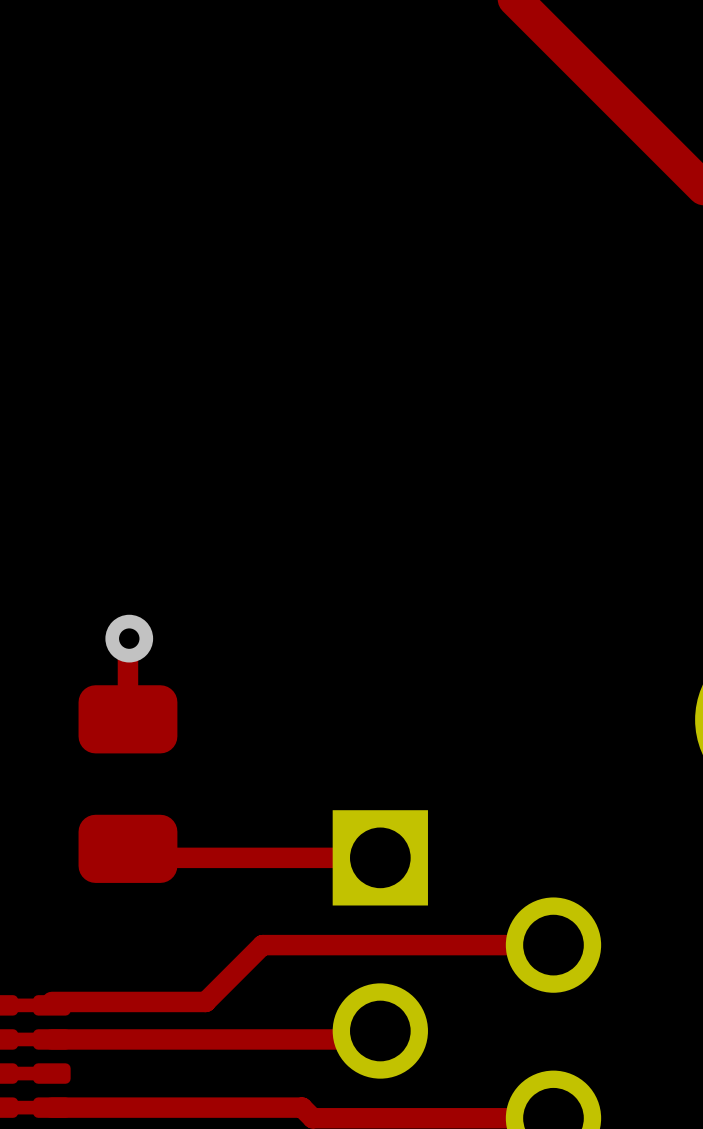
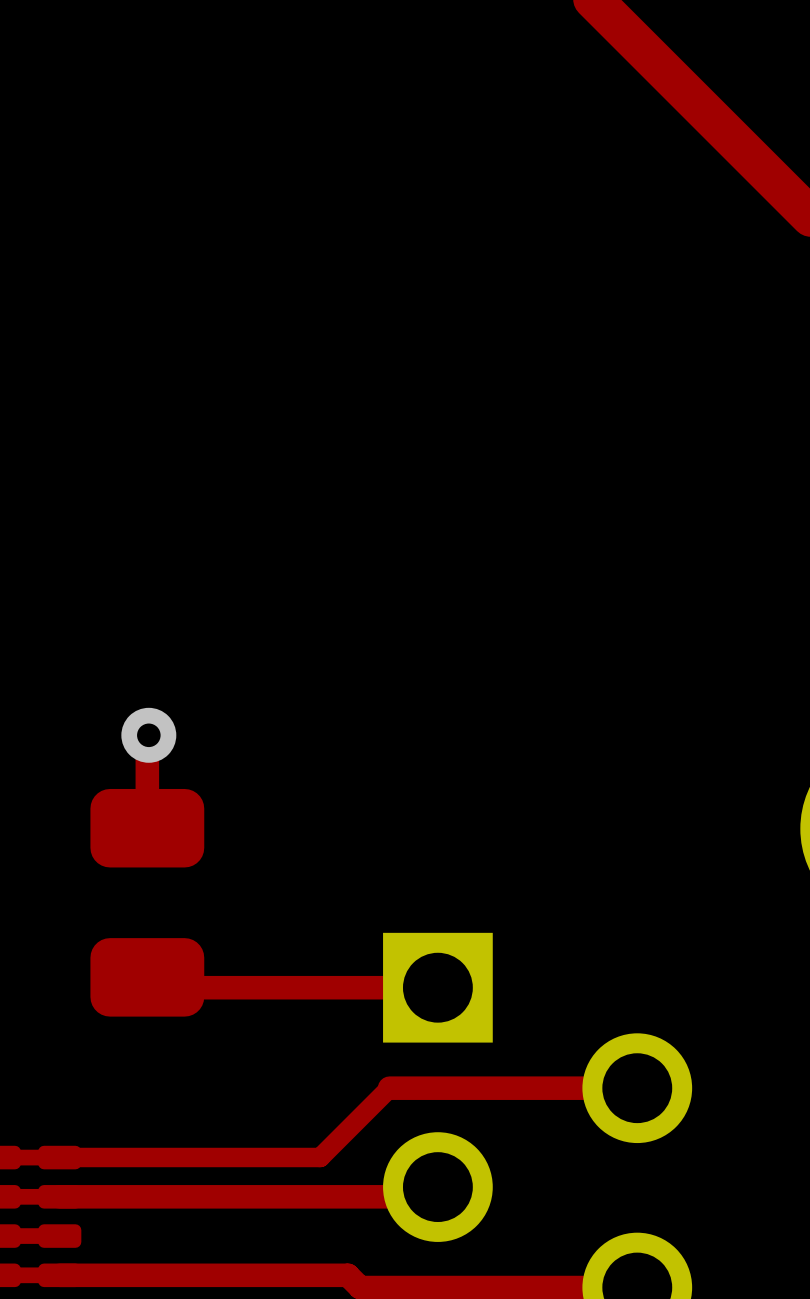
top track: (338, 945) (262, 945) (205, 1001) (51, 1001) -> (389, 1088) (320, 1157) (59, 1157)

